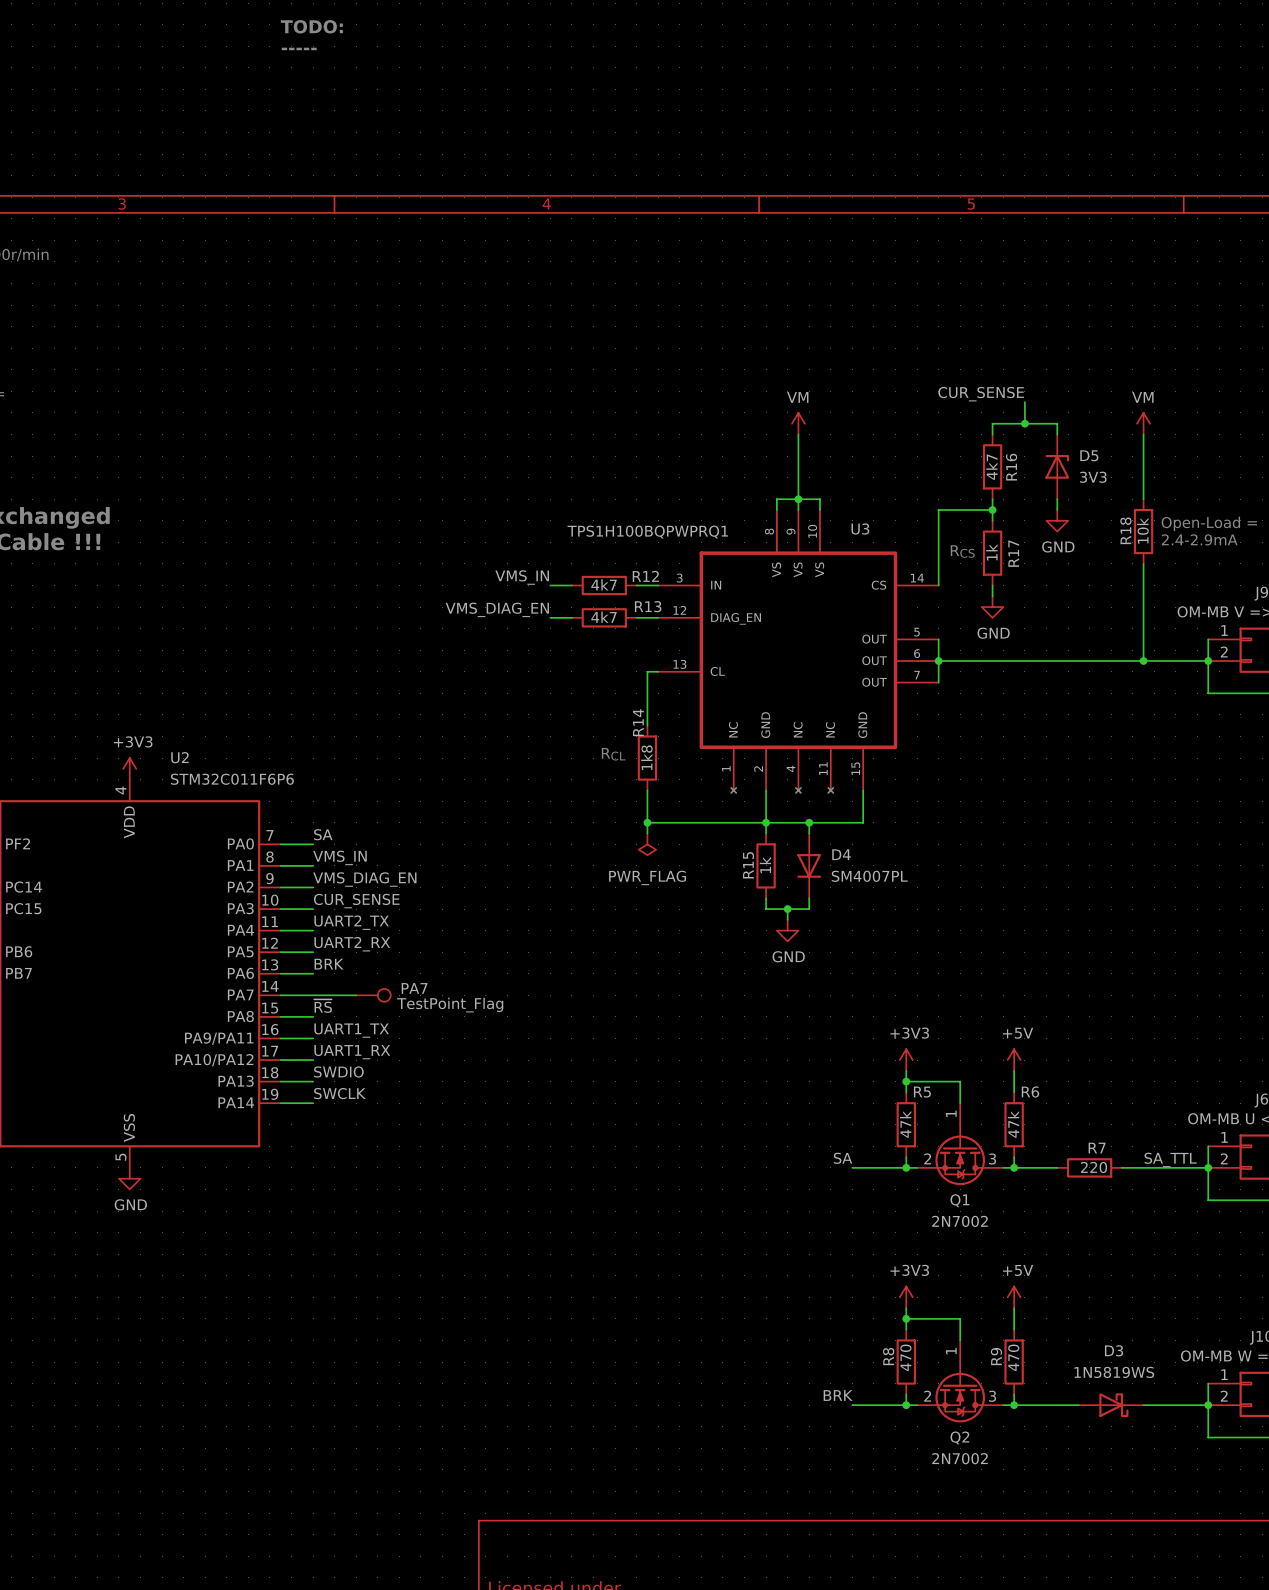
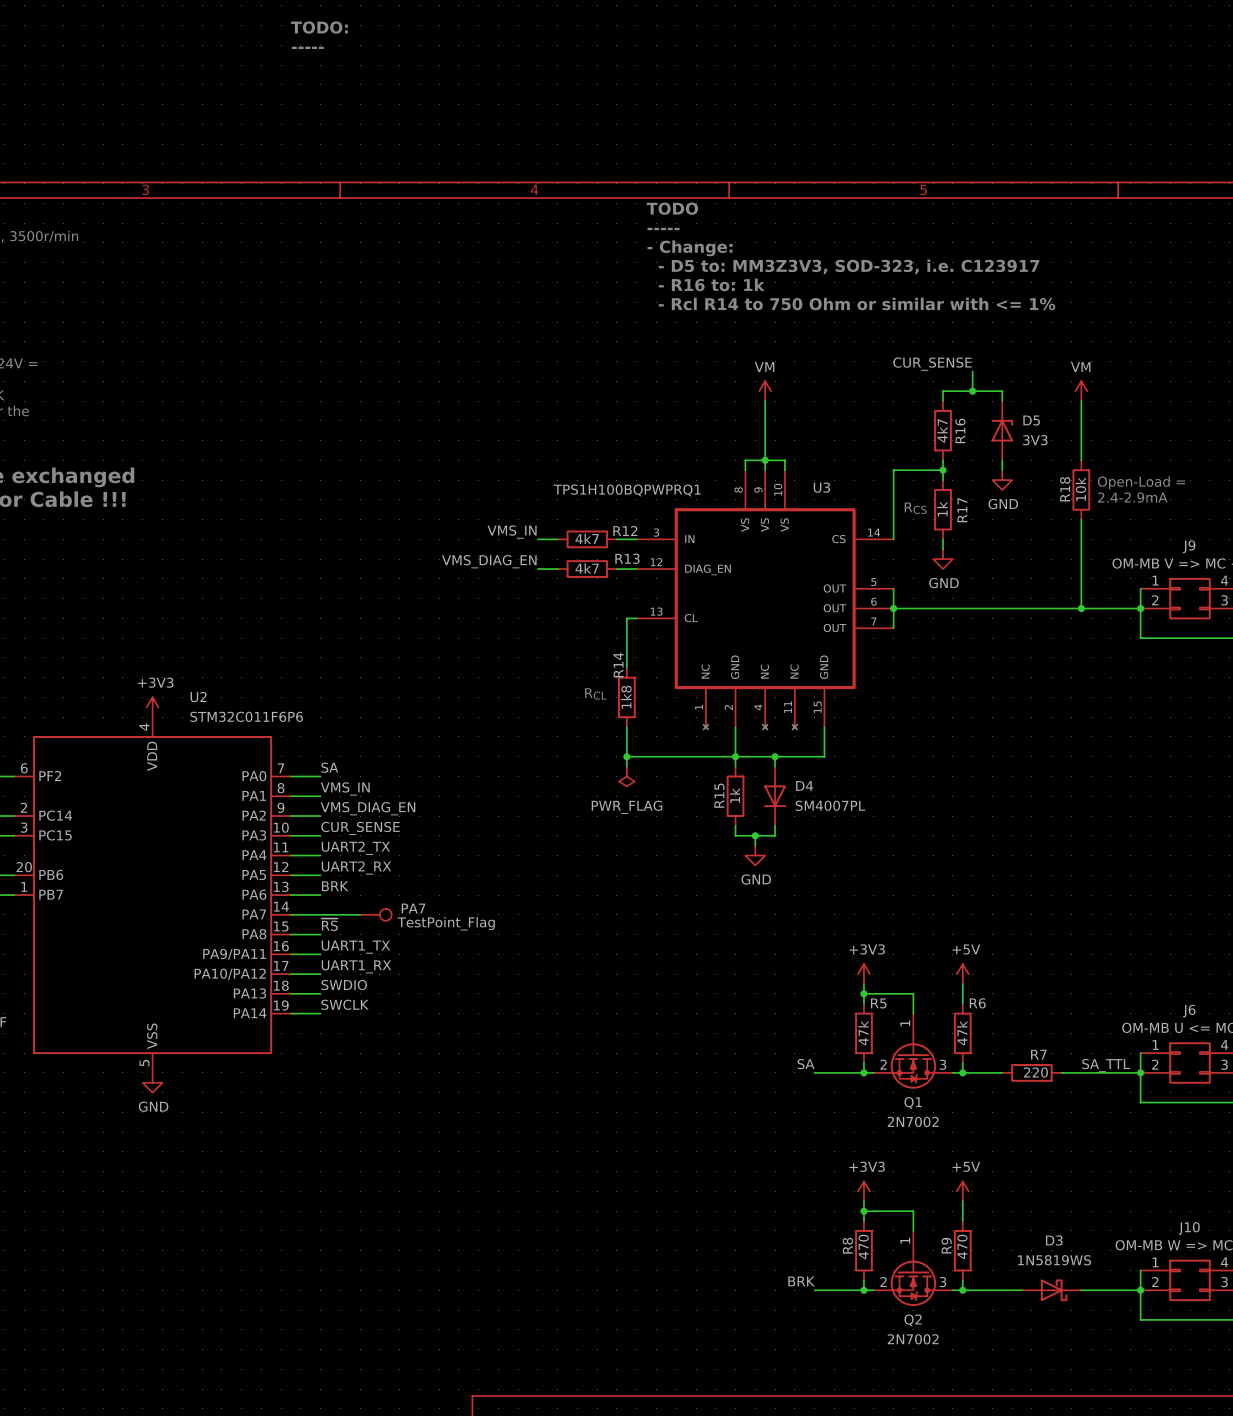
text: none -> TODO (672, 208)
text: none -> ----- (663, 229)
text: none -> - Change: (689, 248)
text: none -> - D5 to: MM3Z3V3, SOD-323, i.e. C123917 (849, 266)
text: none -> - R16 to: 1k (711, 284)
text: none -> - Rcl R14 to 750 Ohm or similar with <= 1% (857, 303)

